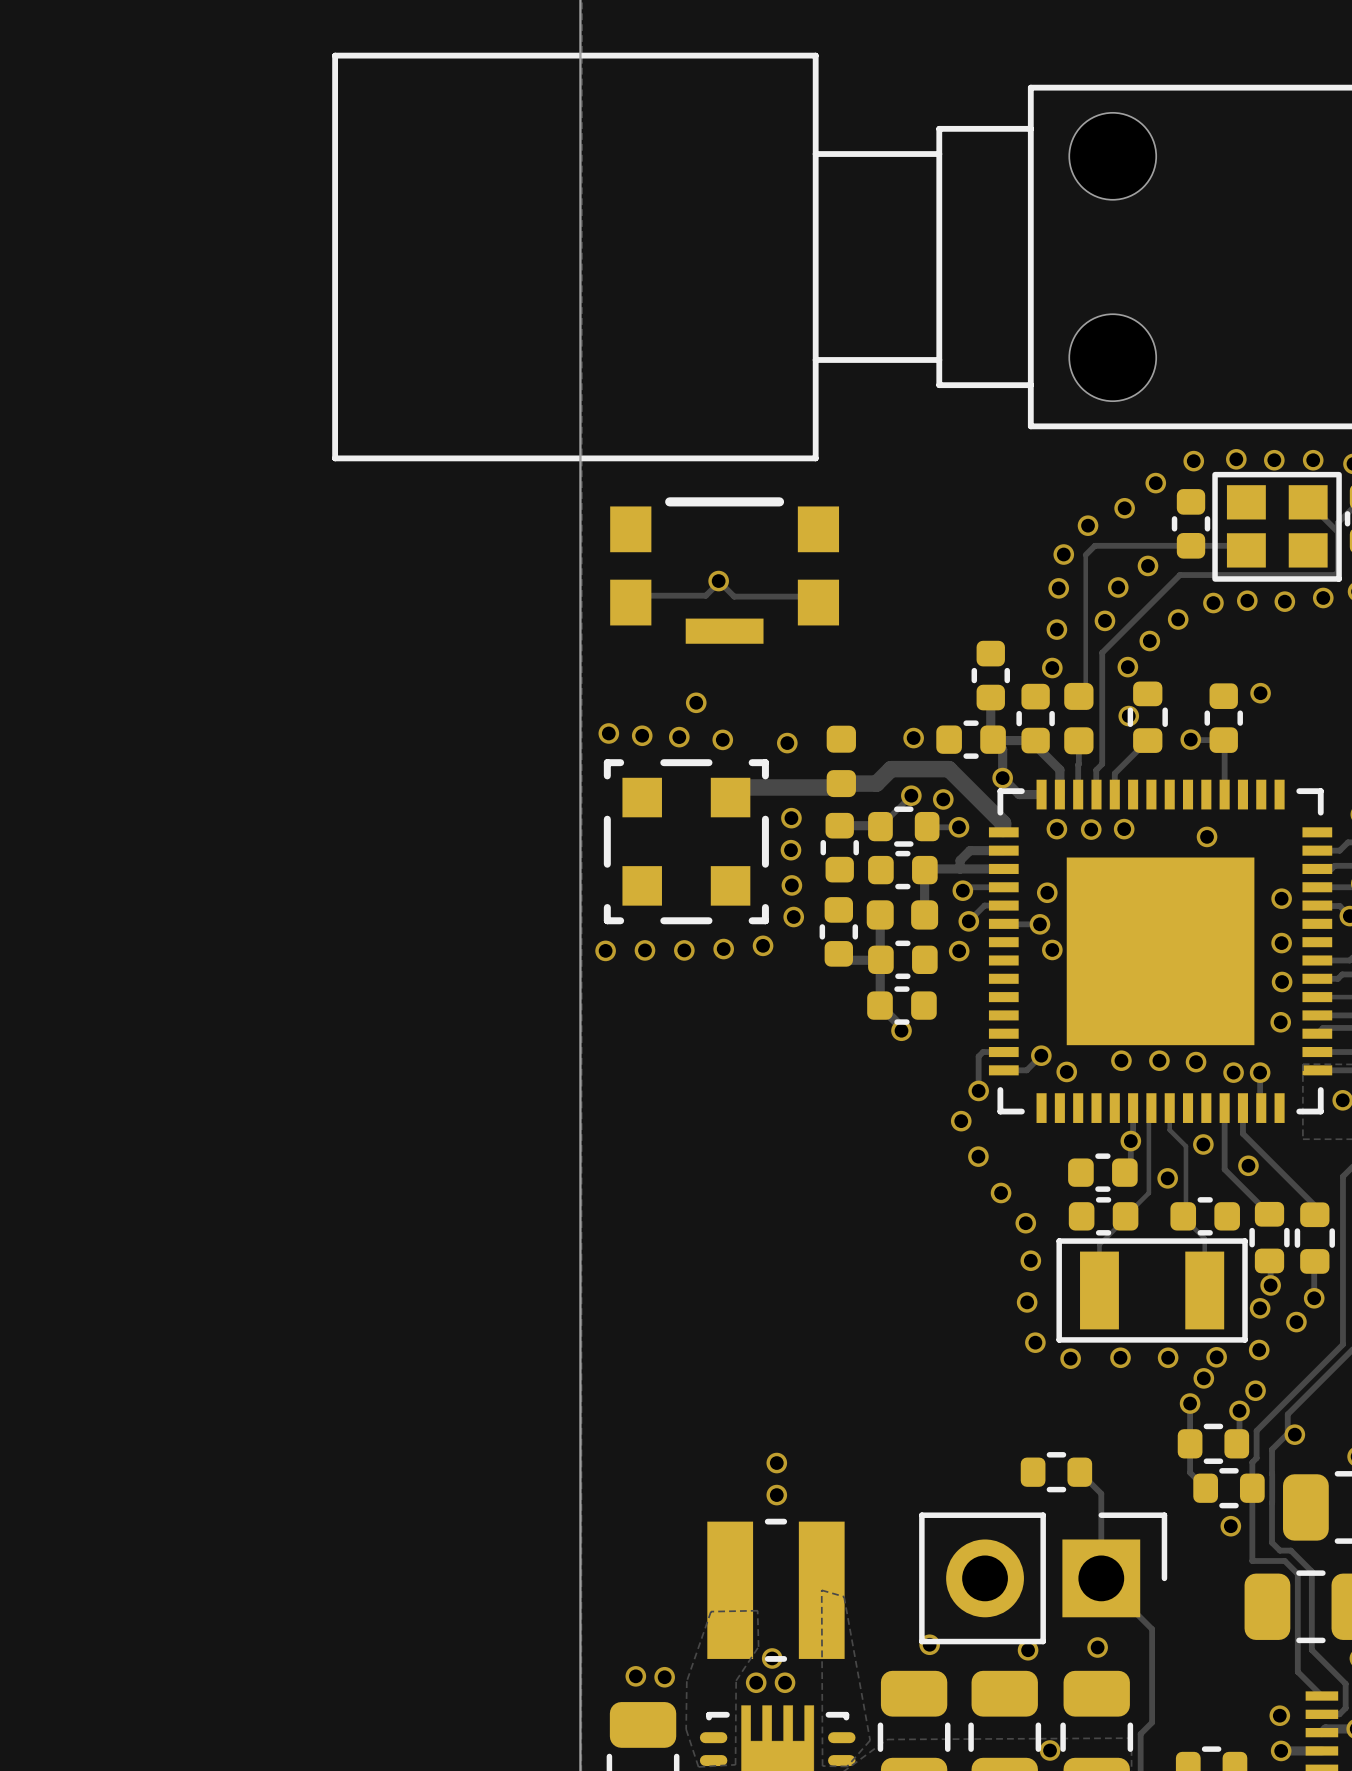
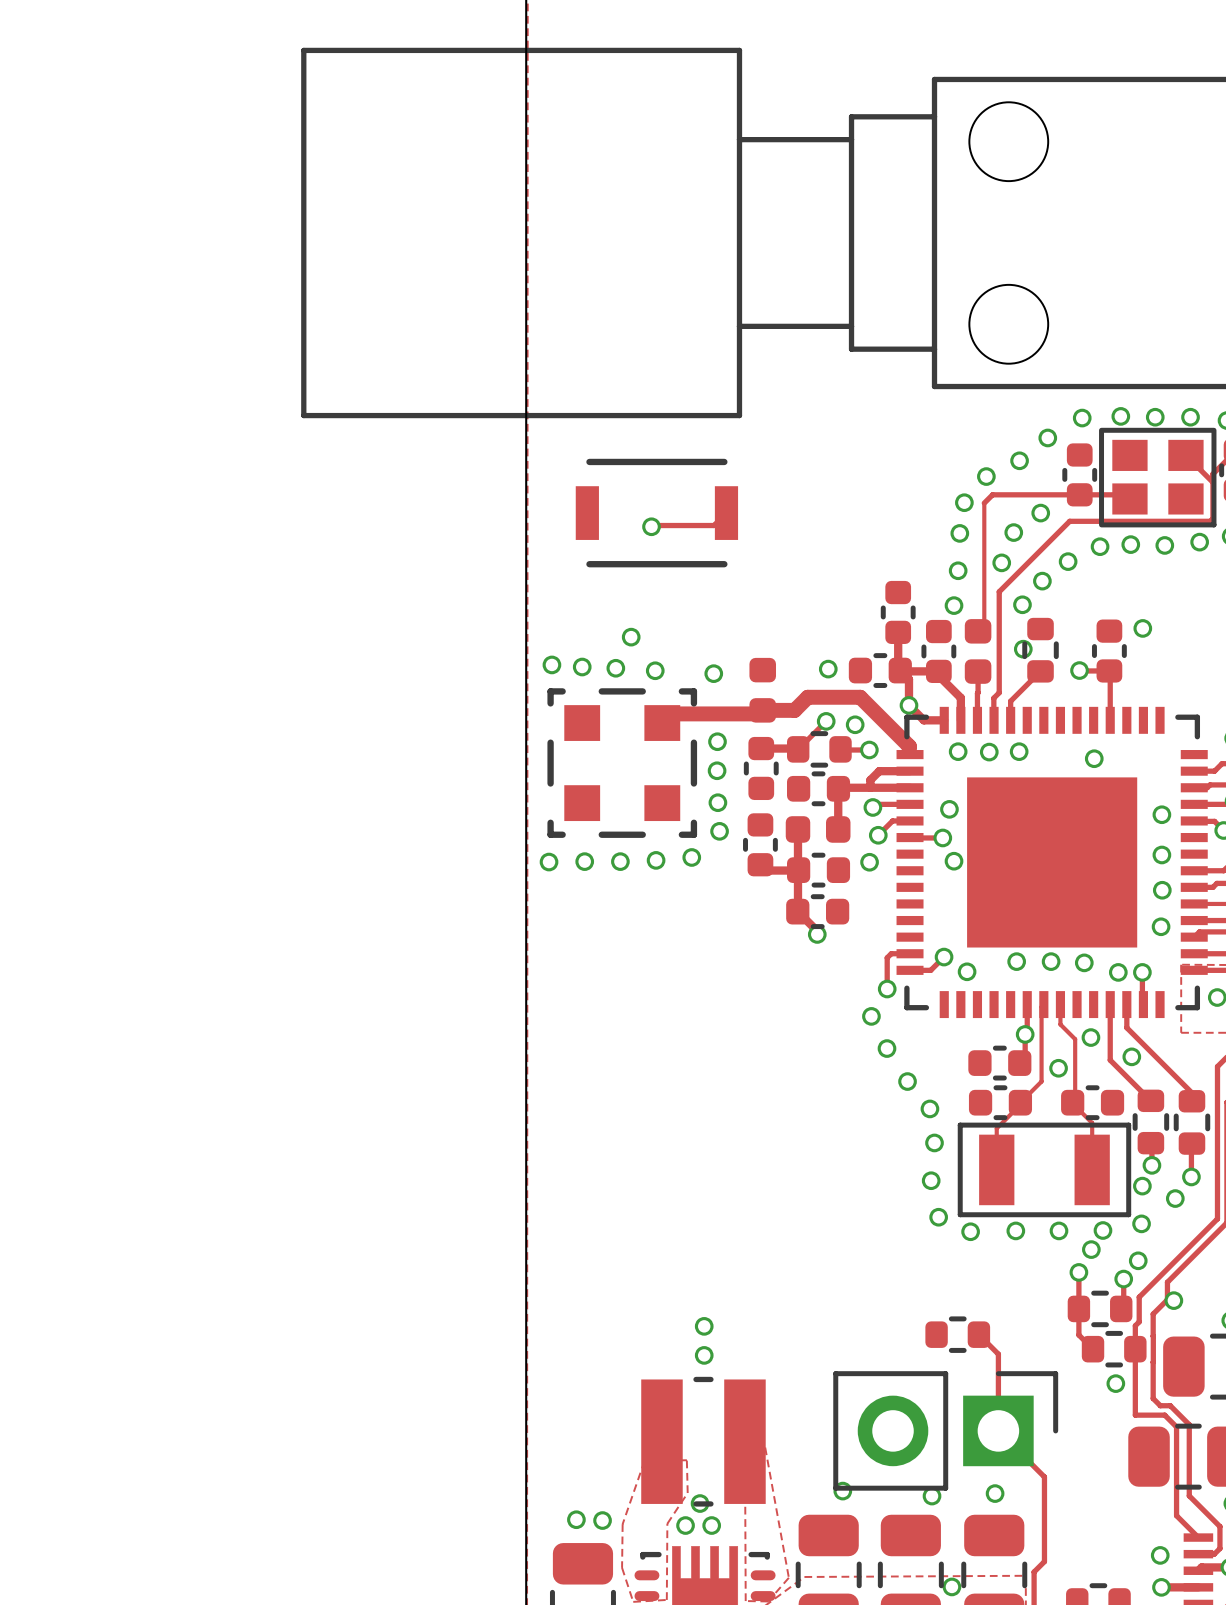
part footprint: [610, 497, 840, 644] -> [575, 458, 739, 568]
track: (718, 581) (734, 596) (812, 596) (818, 602) -> (651, 526) (714, 525) (726, 513)
track: (718, 582) (705, 595) (637, 595) (630, 602) -> none

